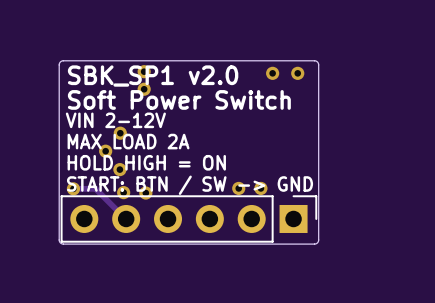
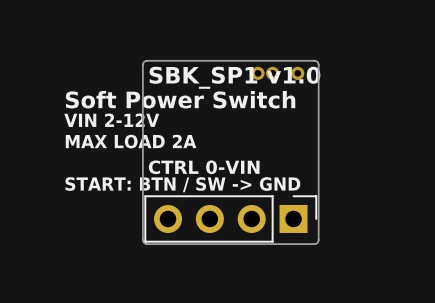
board edge: (147, 60) (63, 60) (59, 64) (59, 241) (63, 244) (147, 244) -> (147, 60) (142, 64) (142, 239) (147, 244)
via: (144, 71) -> none
via: none -> (257, 73)
text: SBK_SP1 v2.0 (153, 76) -> SBK_SP1 v1.0 (234, 77)
via: (144, 89) -> none
via: (120, 133) -> none
via: (105, 151) -> none
text: HOLD HIGH = ON (146, 162) -> none
text: none -> CTRL 0-VIN (204, 167)
via: (119, 169) -> none
track: (73, 188) (95, 188) (126, 218) -> none
via: (73, 188) -> none
via: (238, 188) -> none
via: (260, 188) -> none
via: (123, 192) -> none
via: (145, 193) -> none
part: (188, 218) -> none
part: none -> (230, 218)

